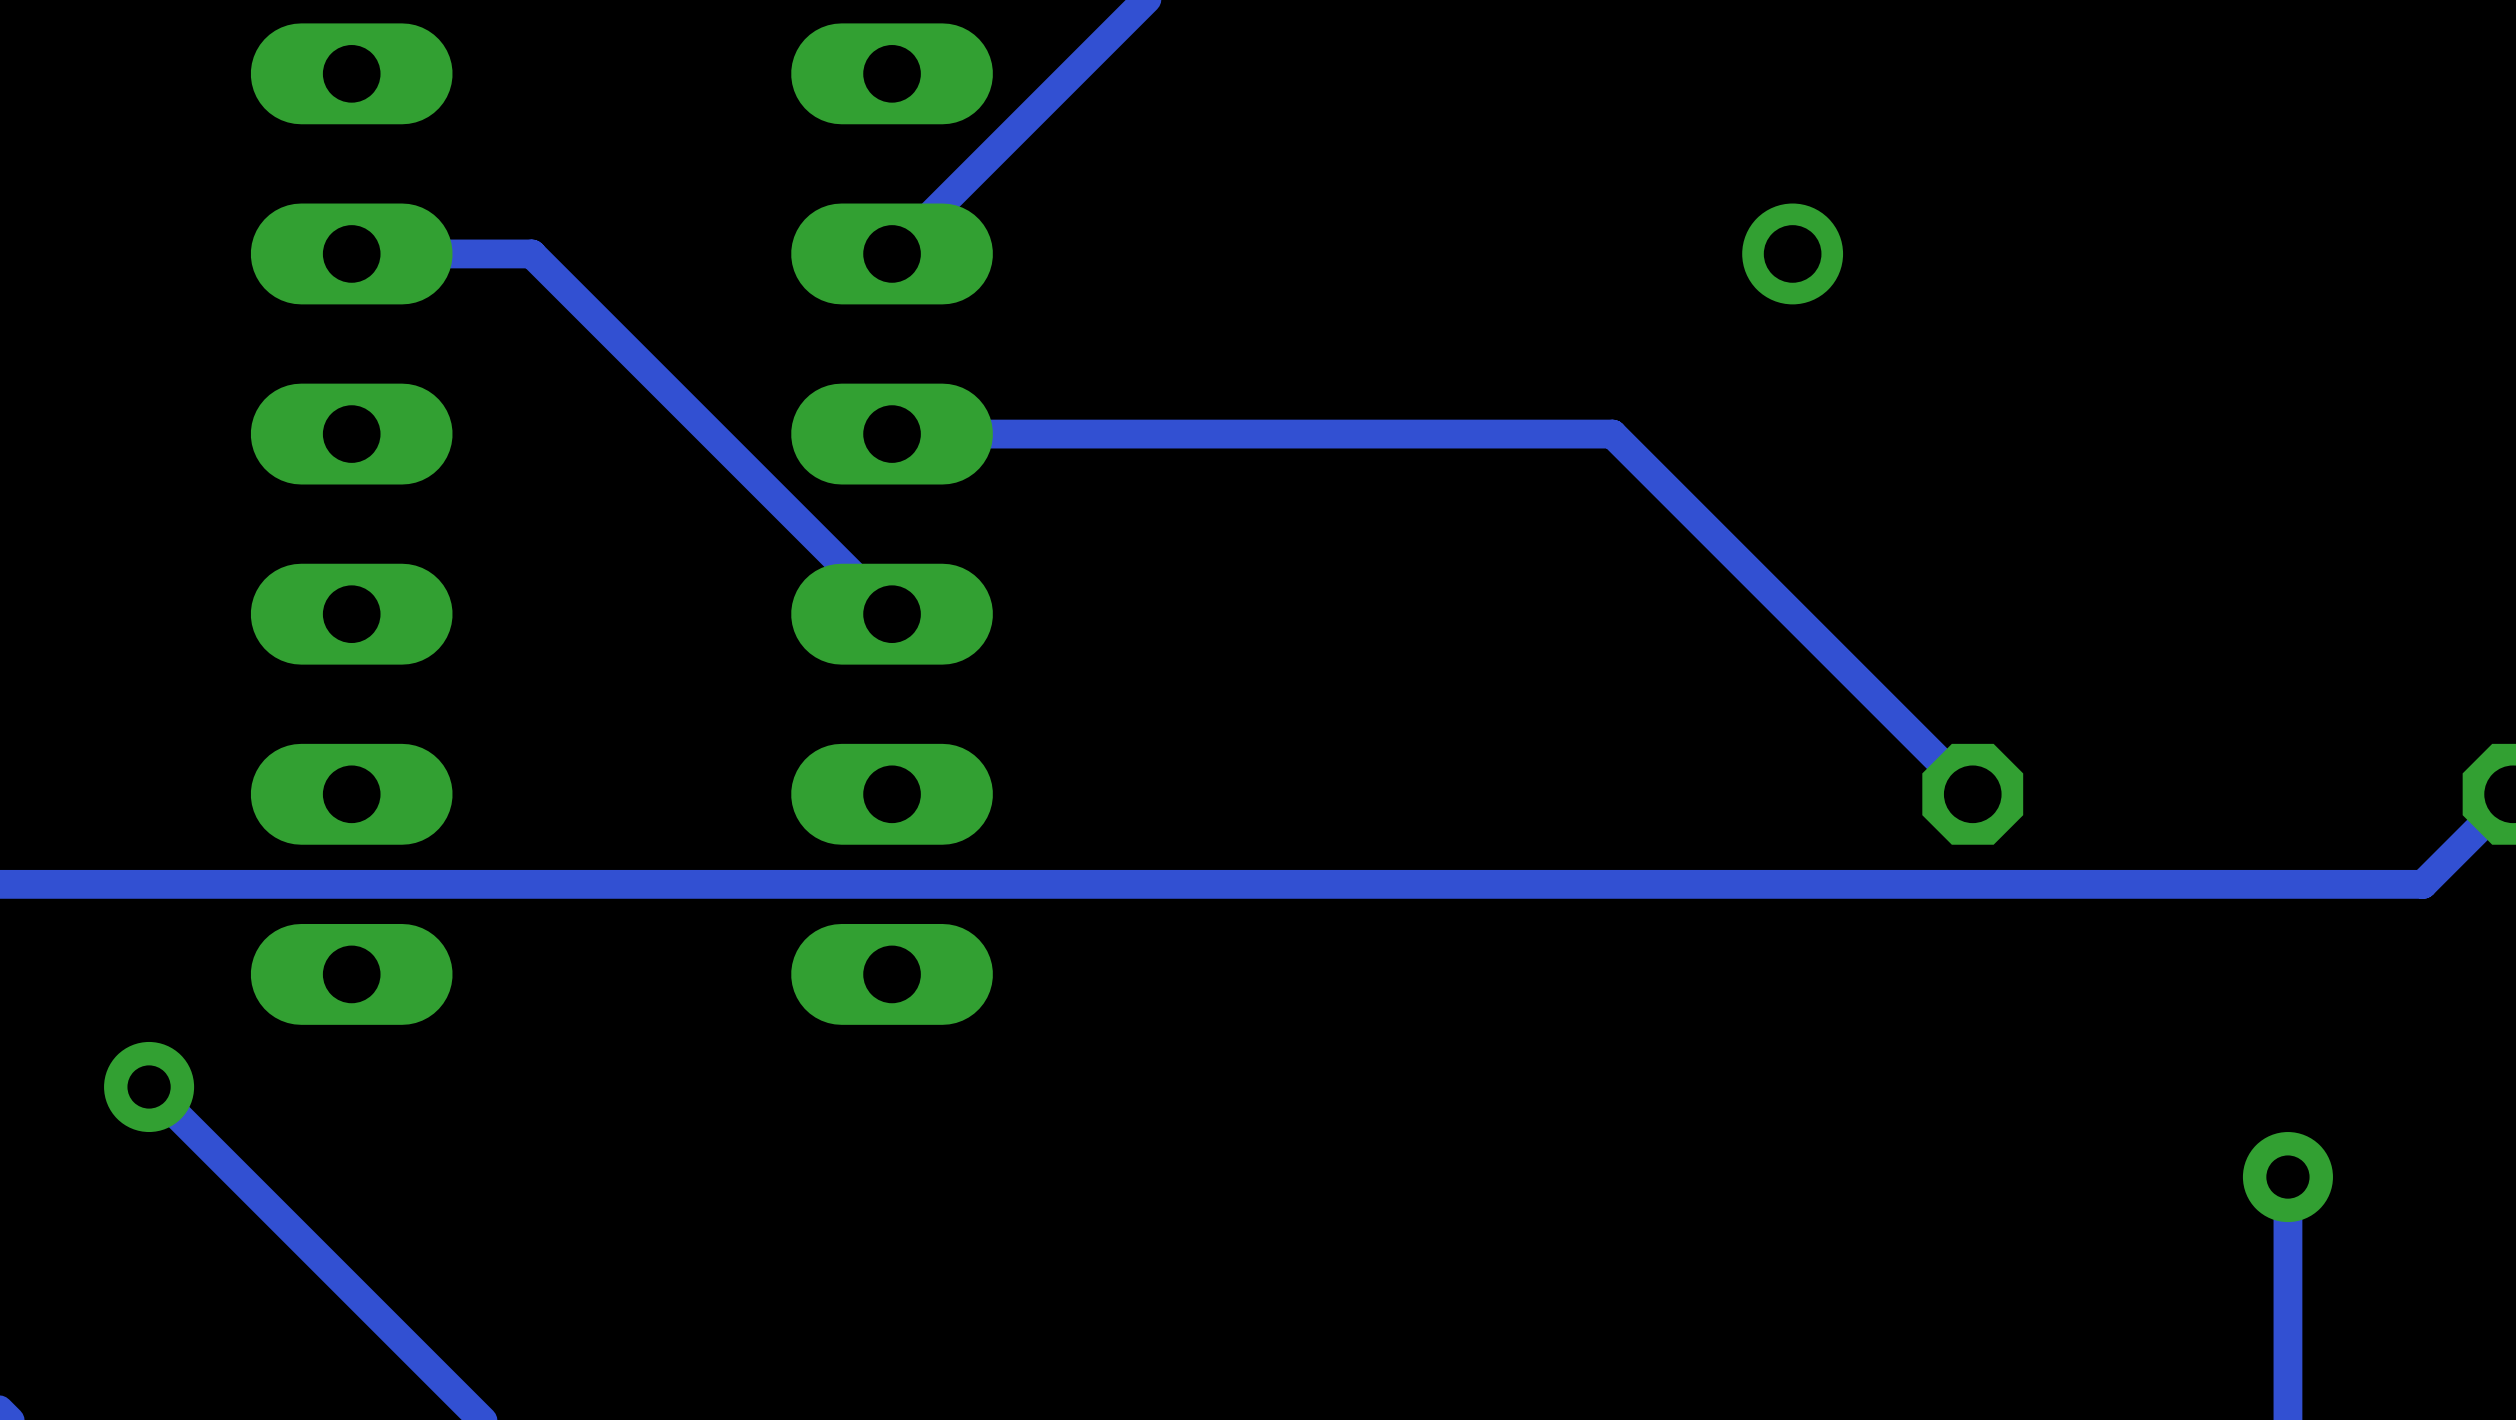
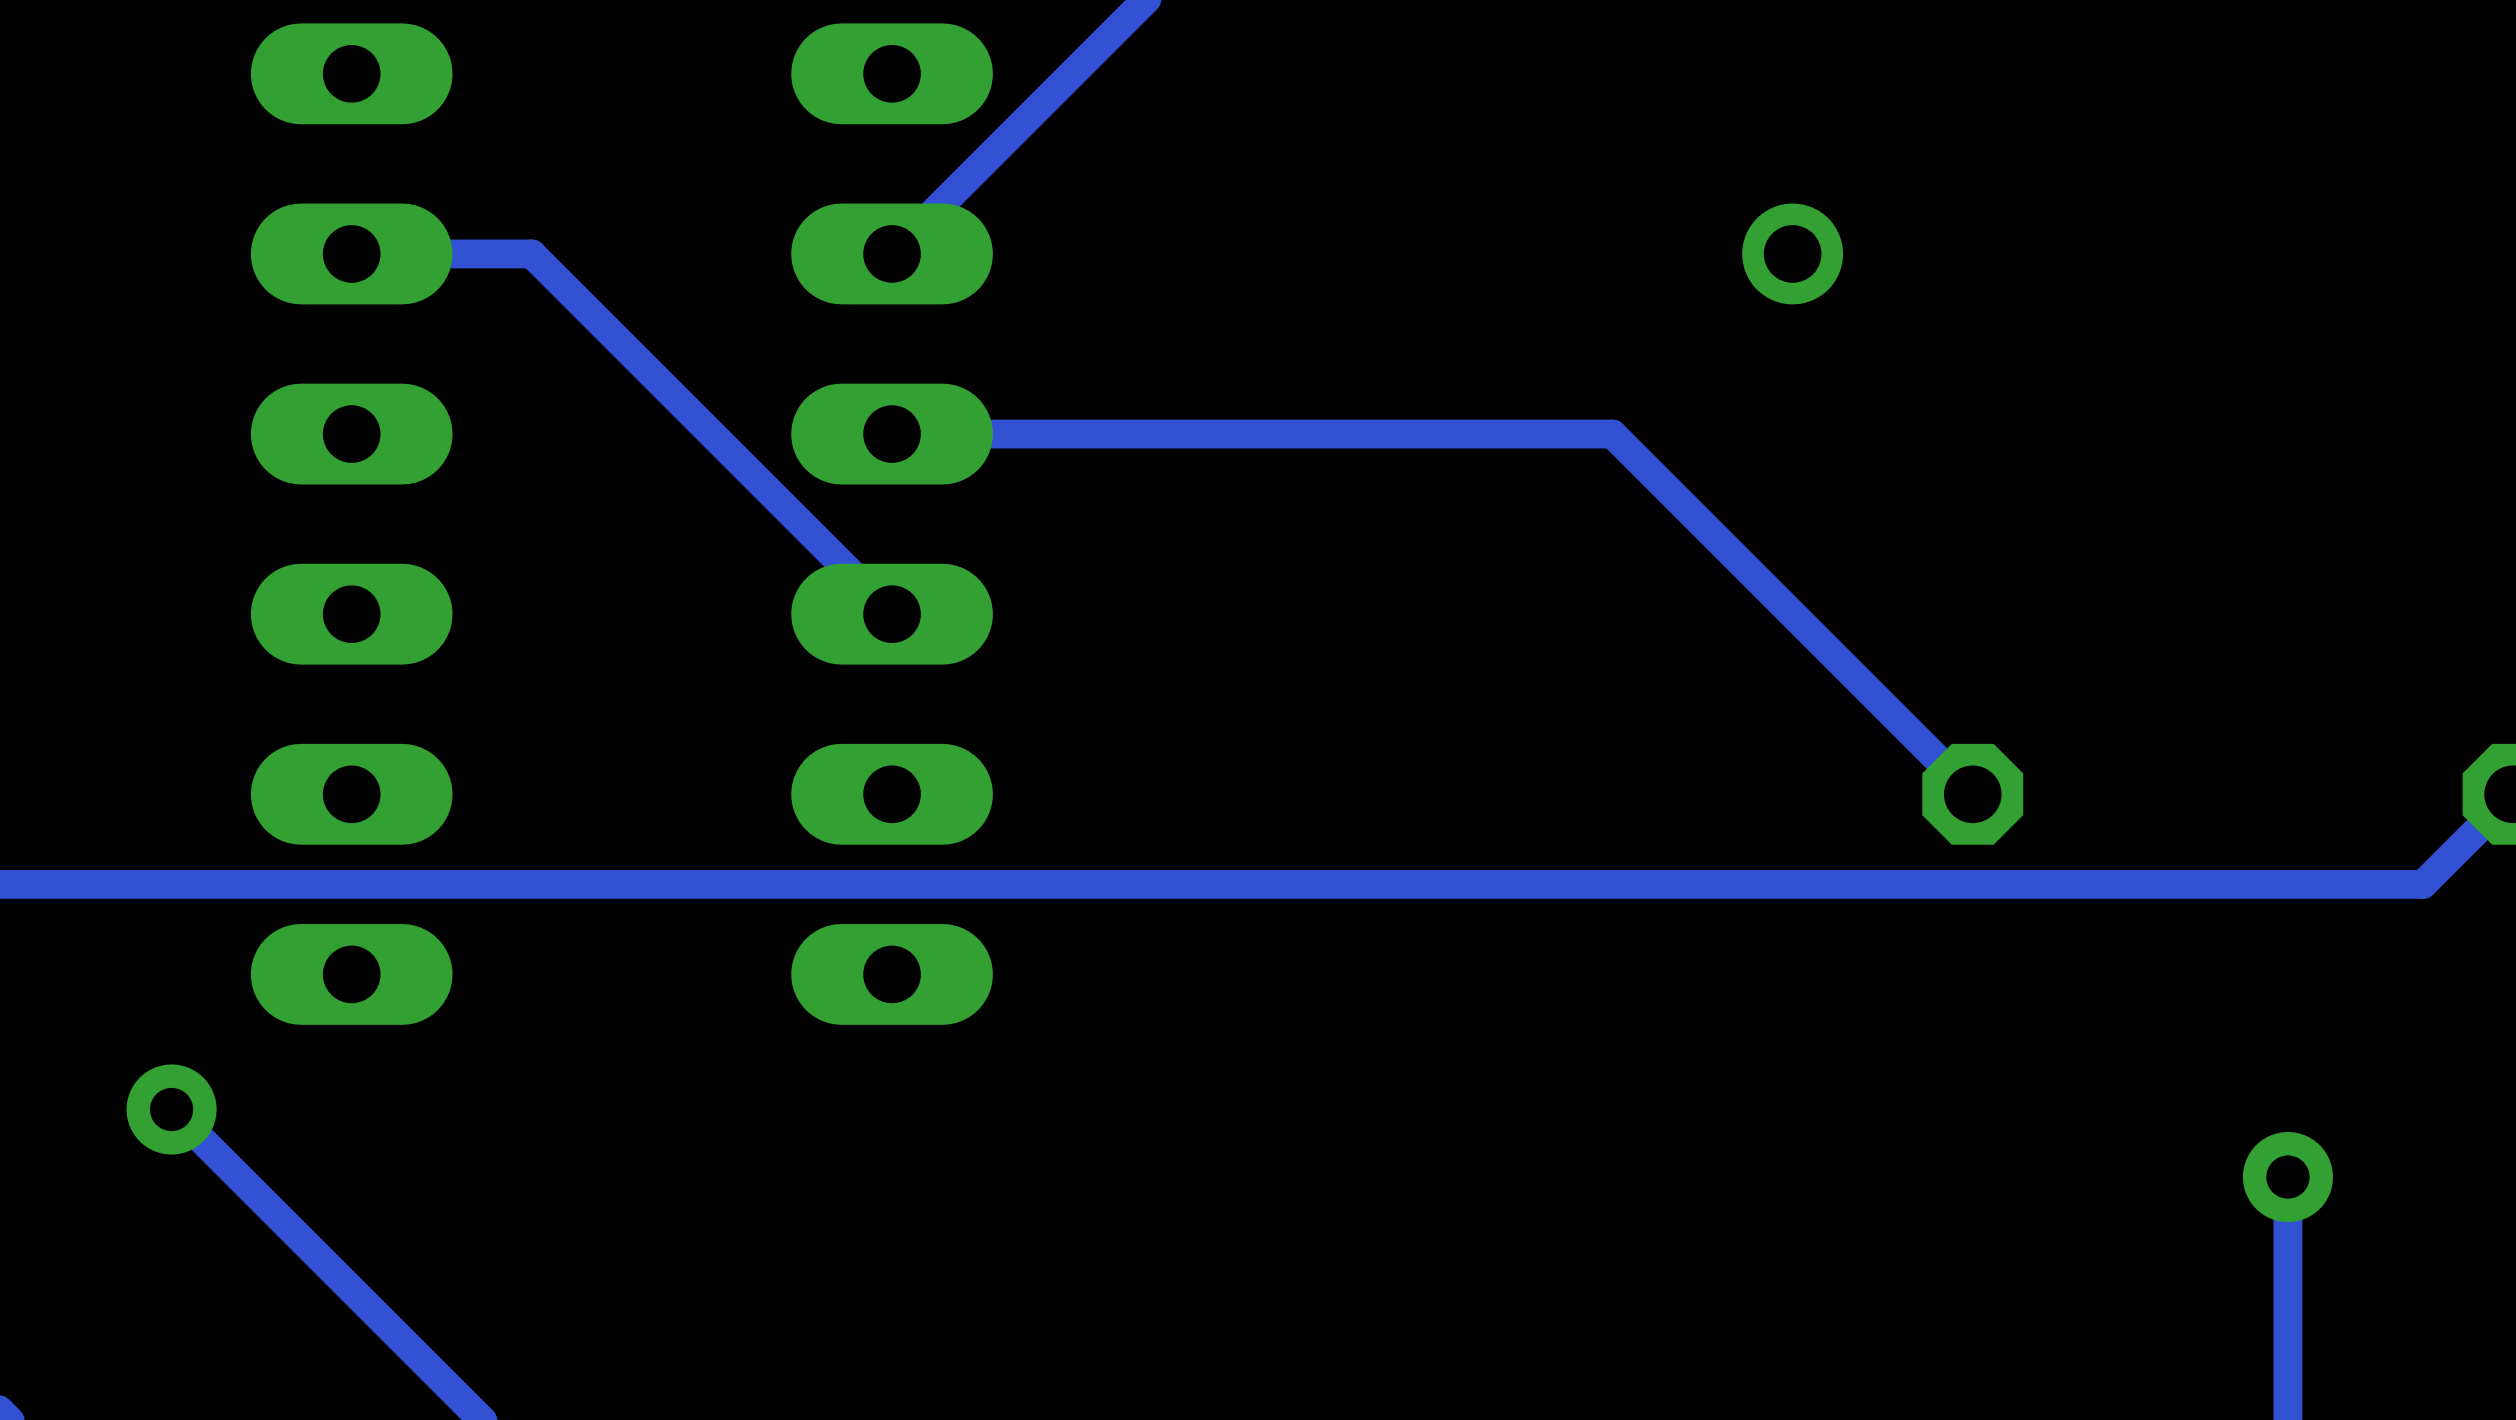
via position: (149, 1086) -> (171, 1109)

